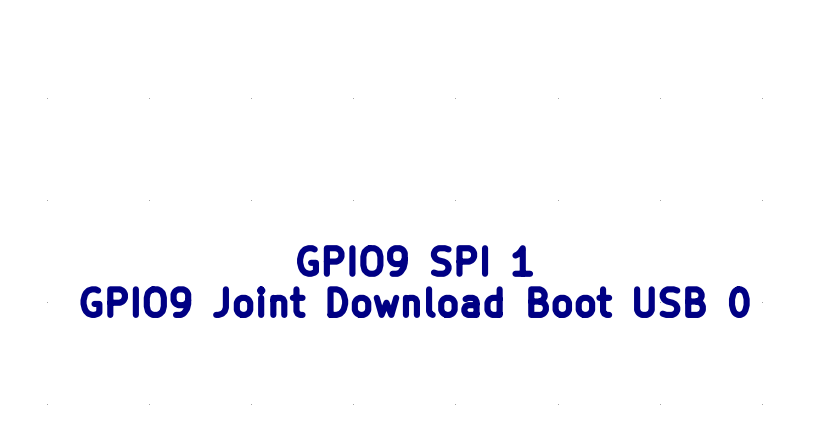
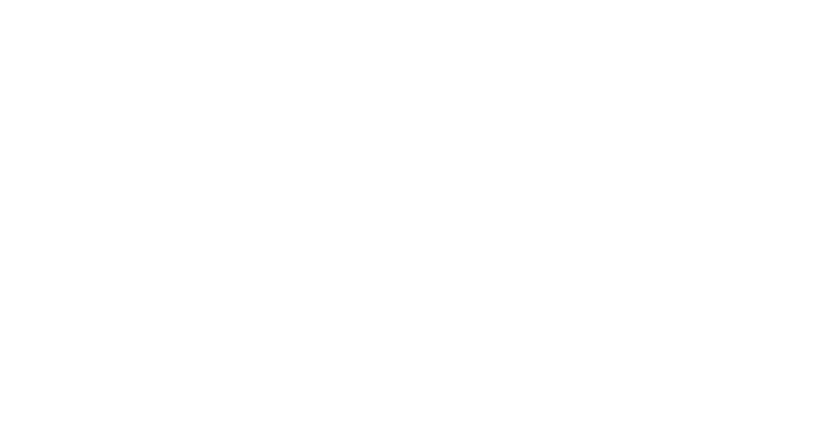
text: GPIO9 SPI 1 (415, 260) -> none
text: GPIO9 Joint Download Boot USB 0 (415, 302) -> none

